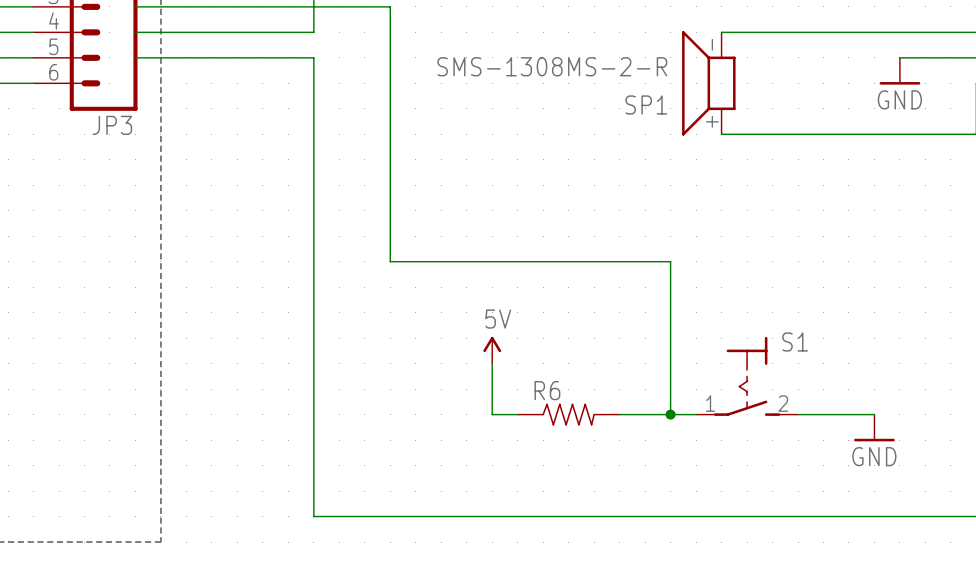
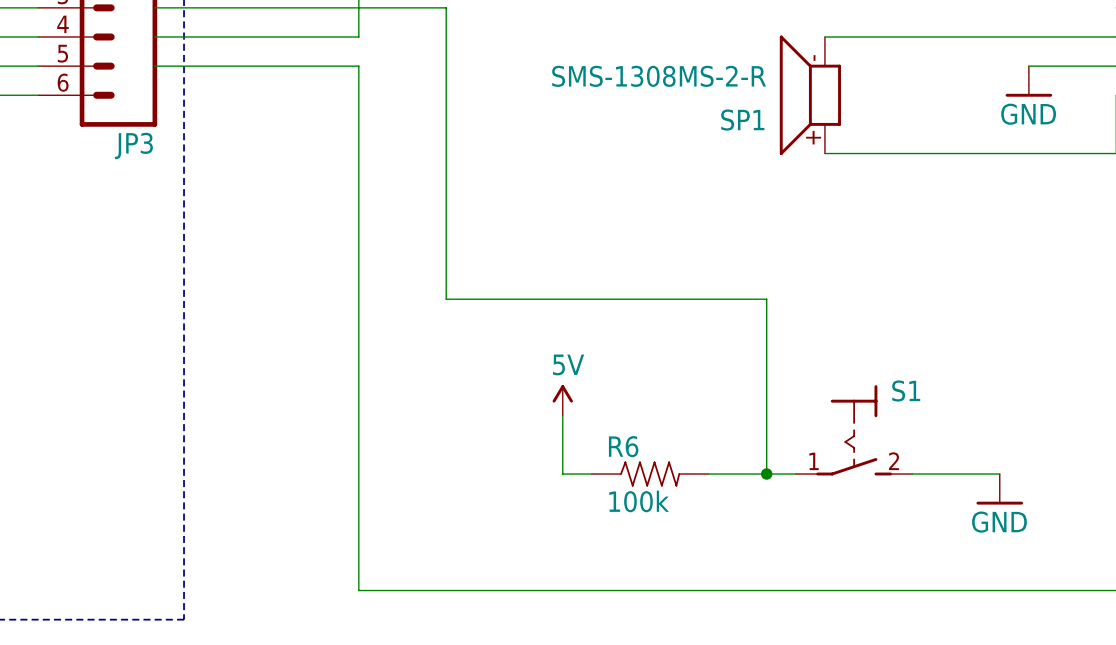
R6 value: none -> 100k (639, 501)

